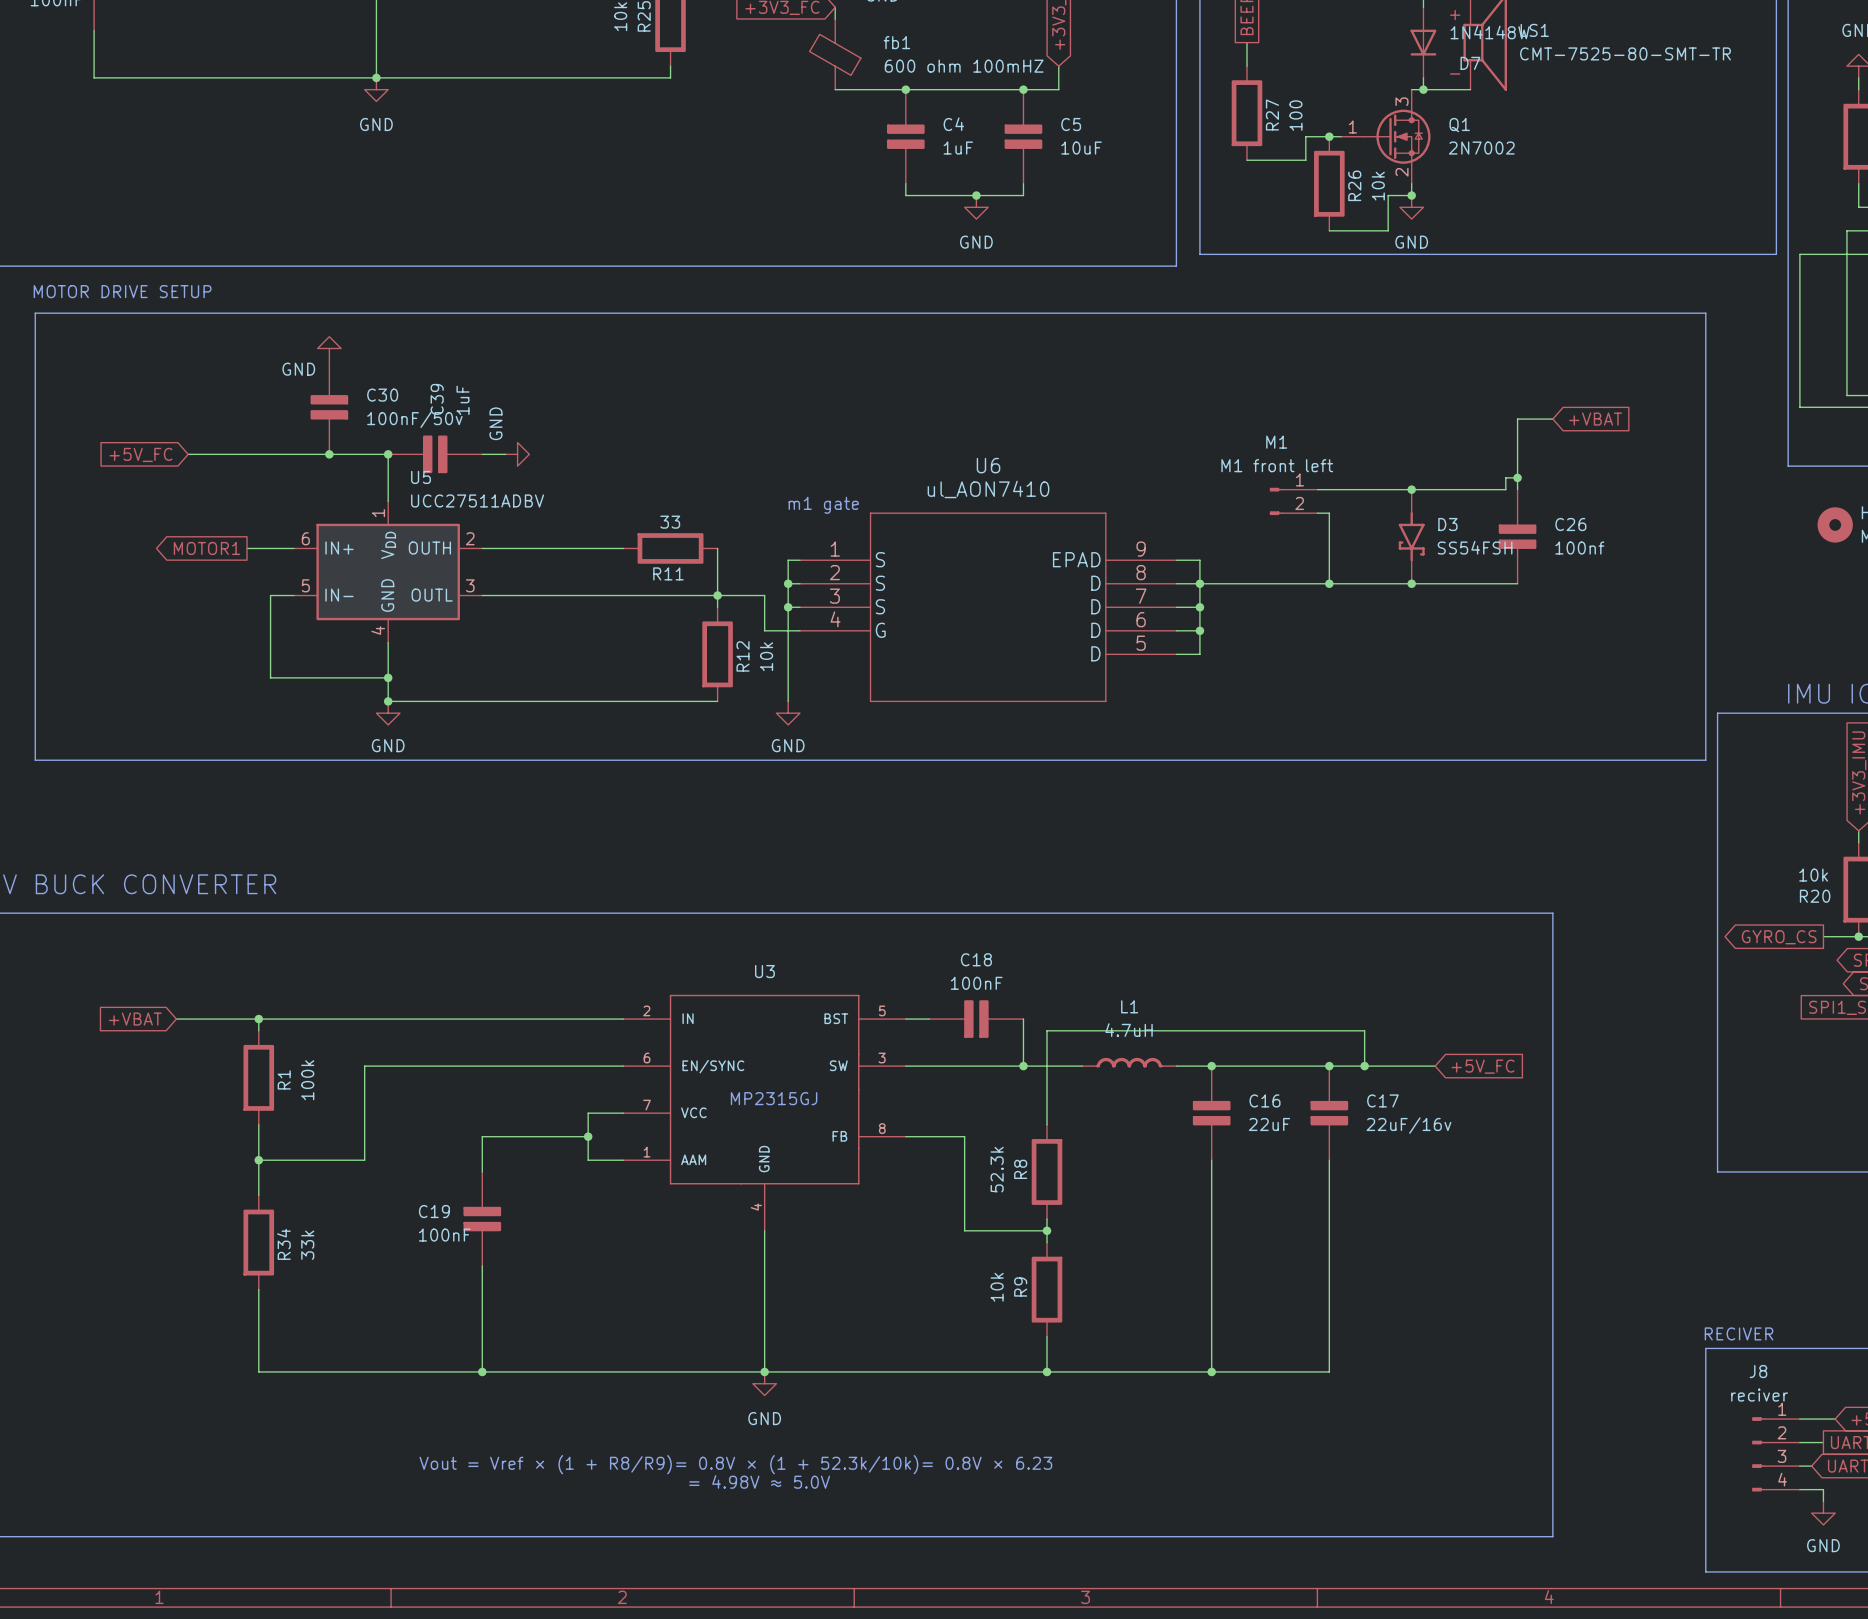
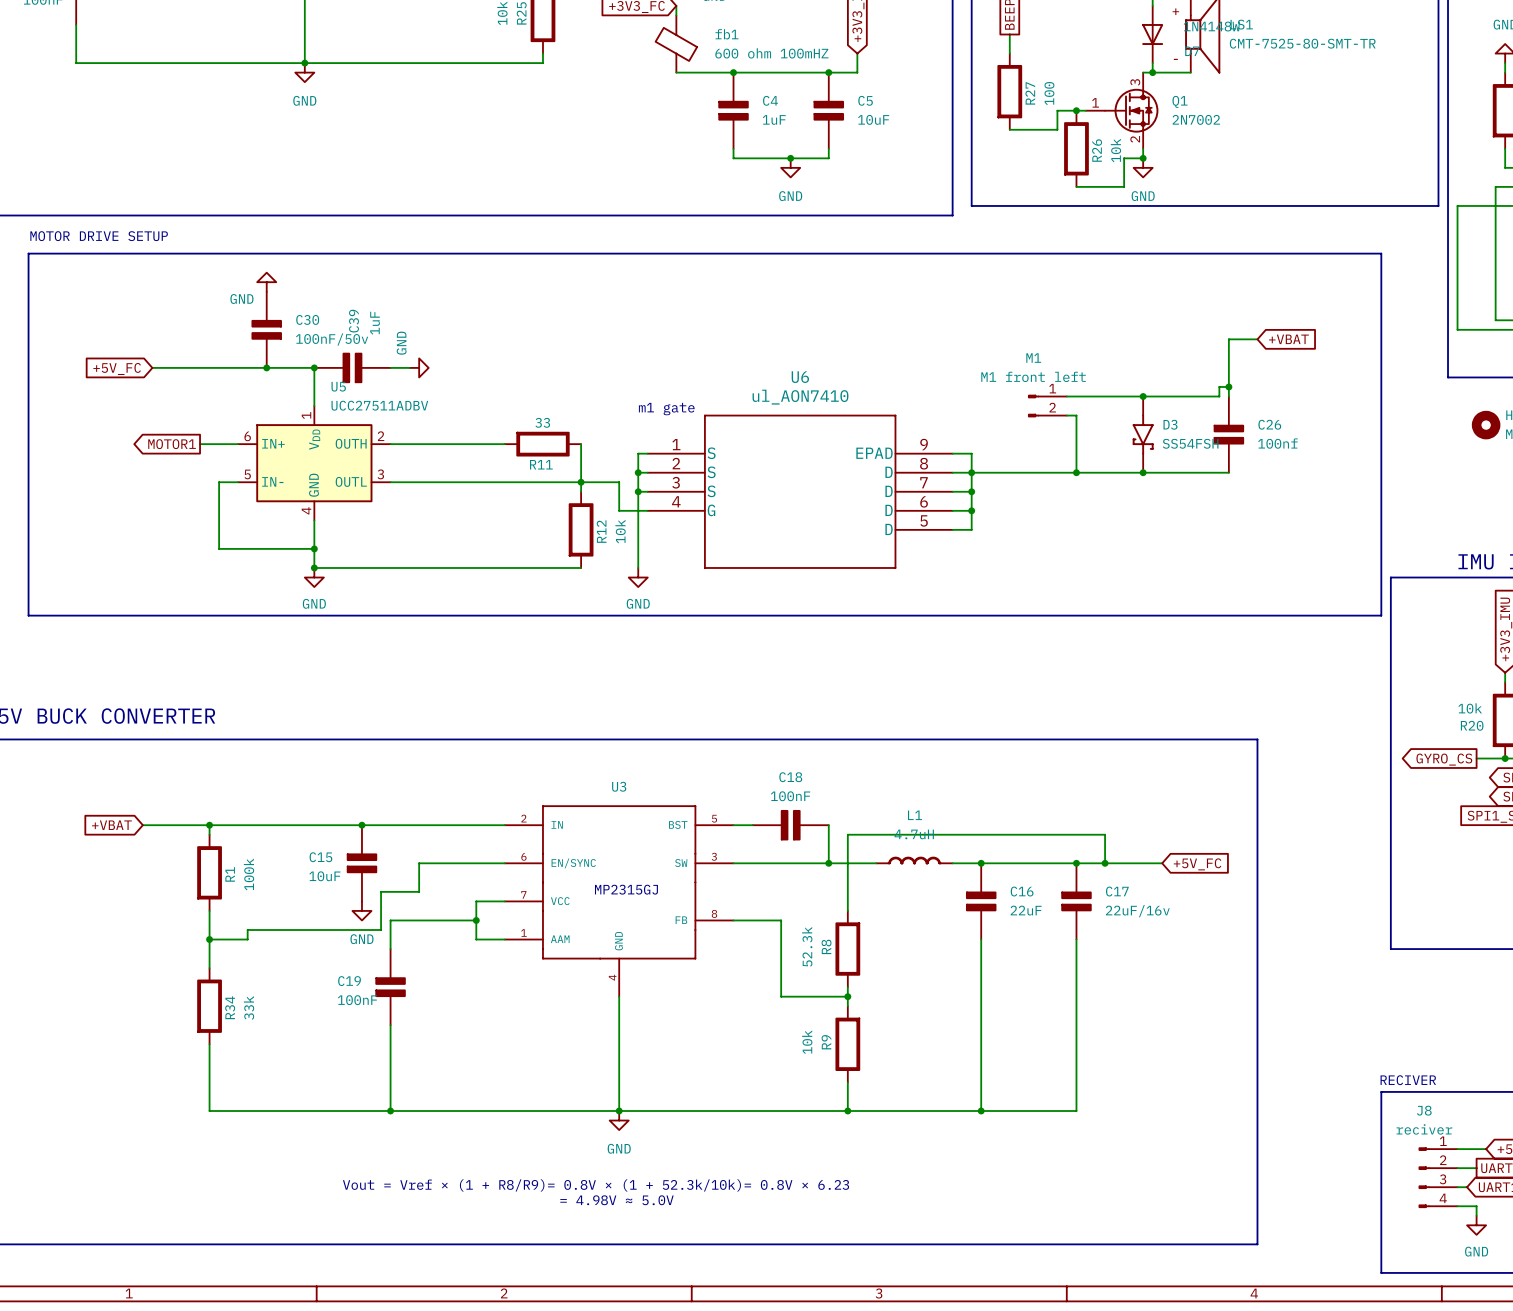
junction: none -> (361, 825)
C15: none -> 10uF (361, 863)
wire: (517, 1066) (364, 1066) (364, 1160) (305, 1160) -> (419, 863) (419, 891) (381, 891) (381, 929) (247, 929) (247, 939)
power symbol: none -> GND (361, 910)

